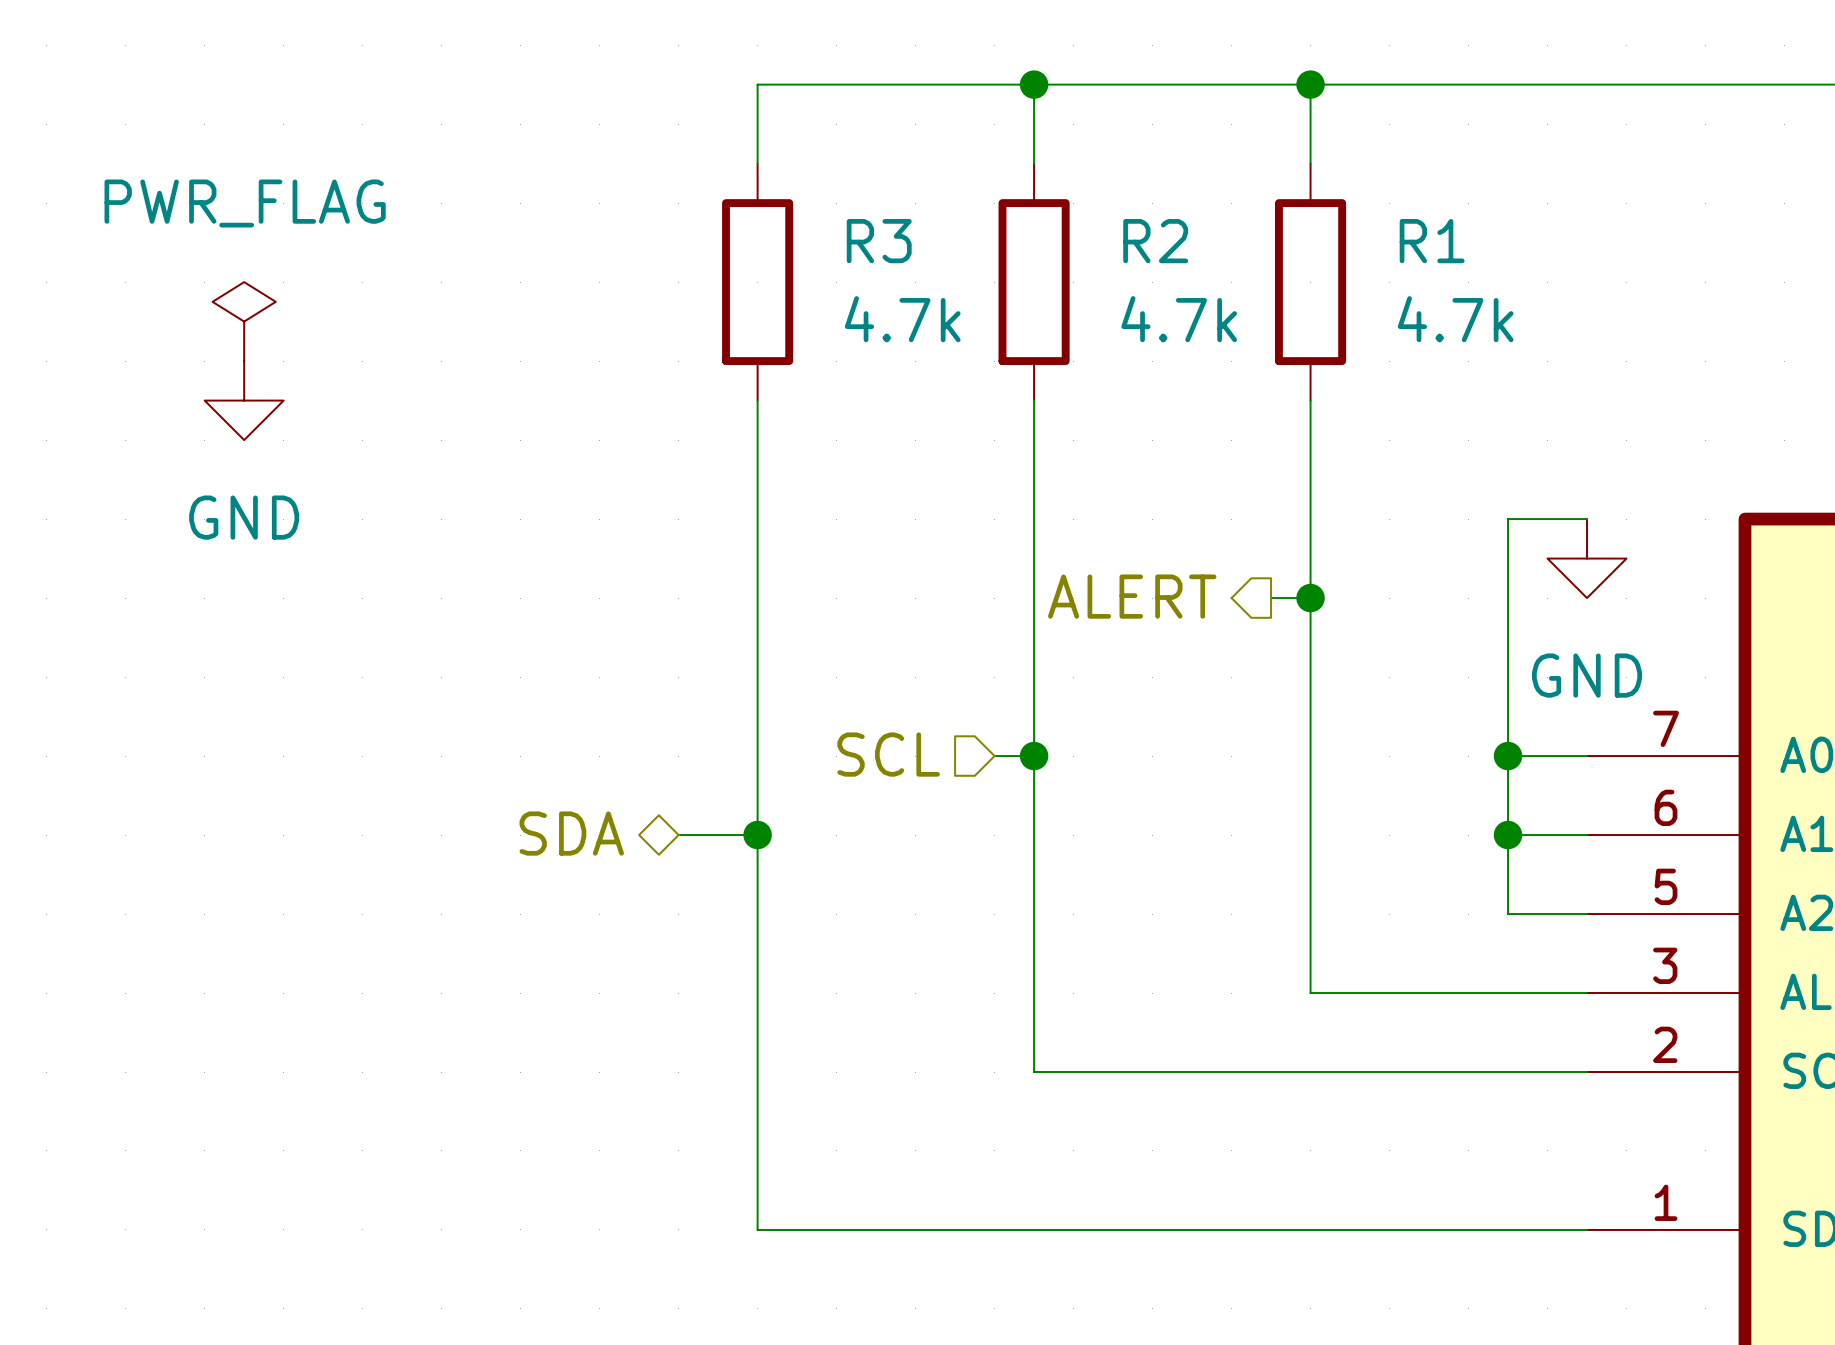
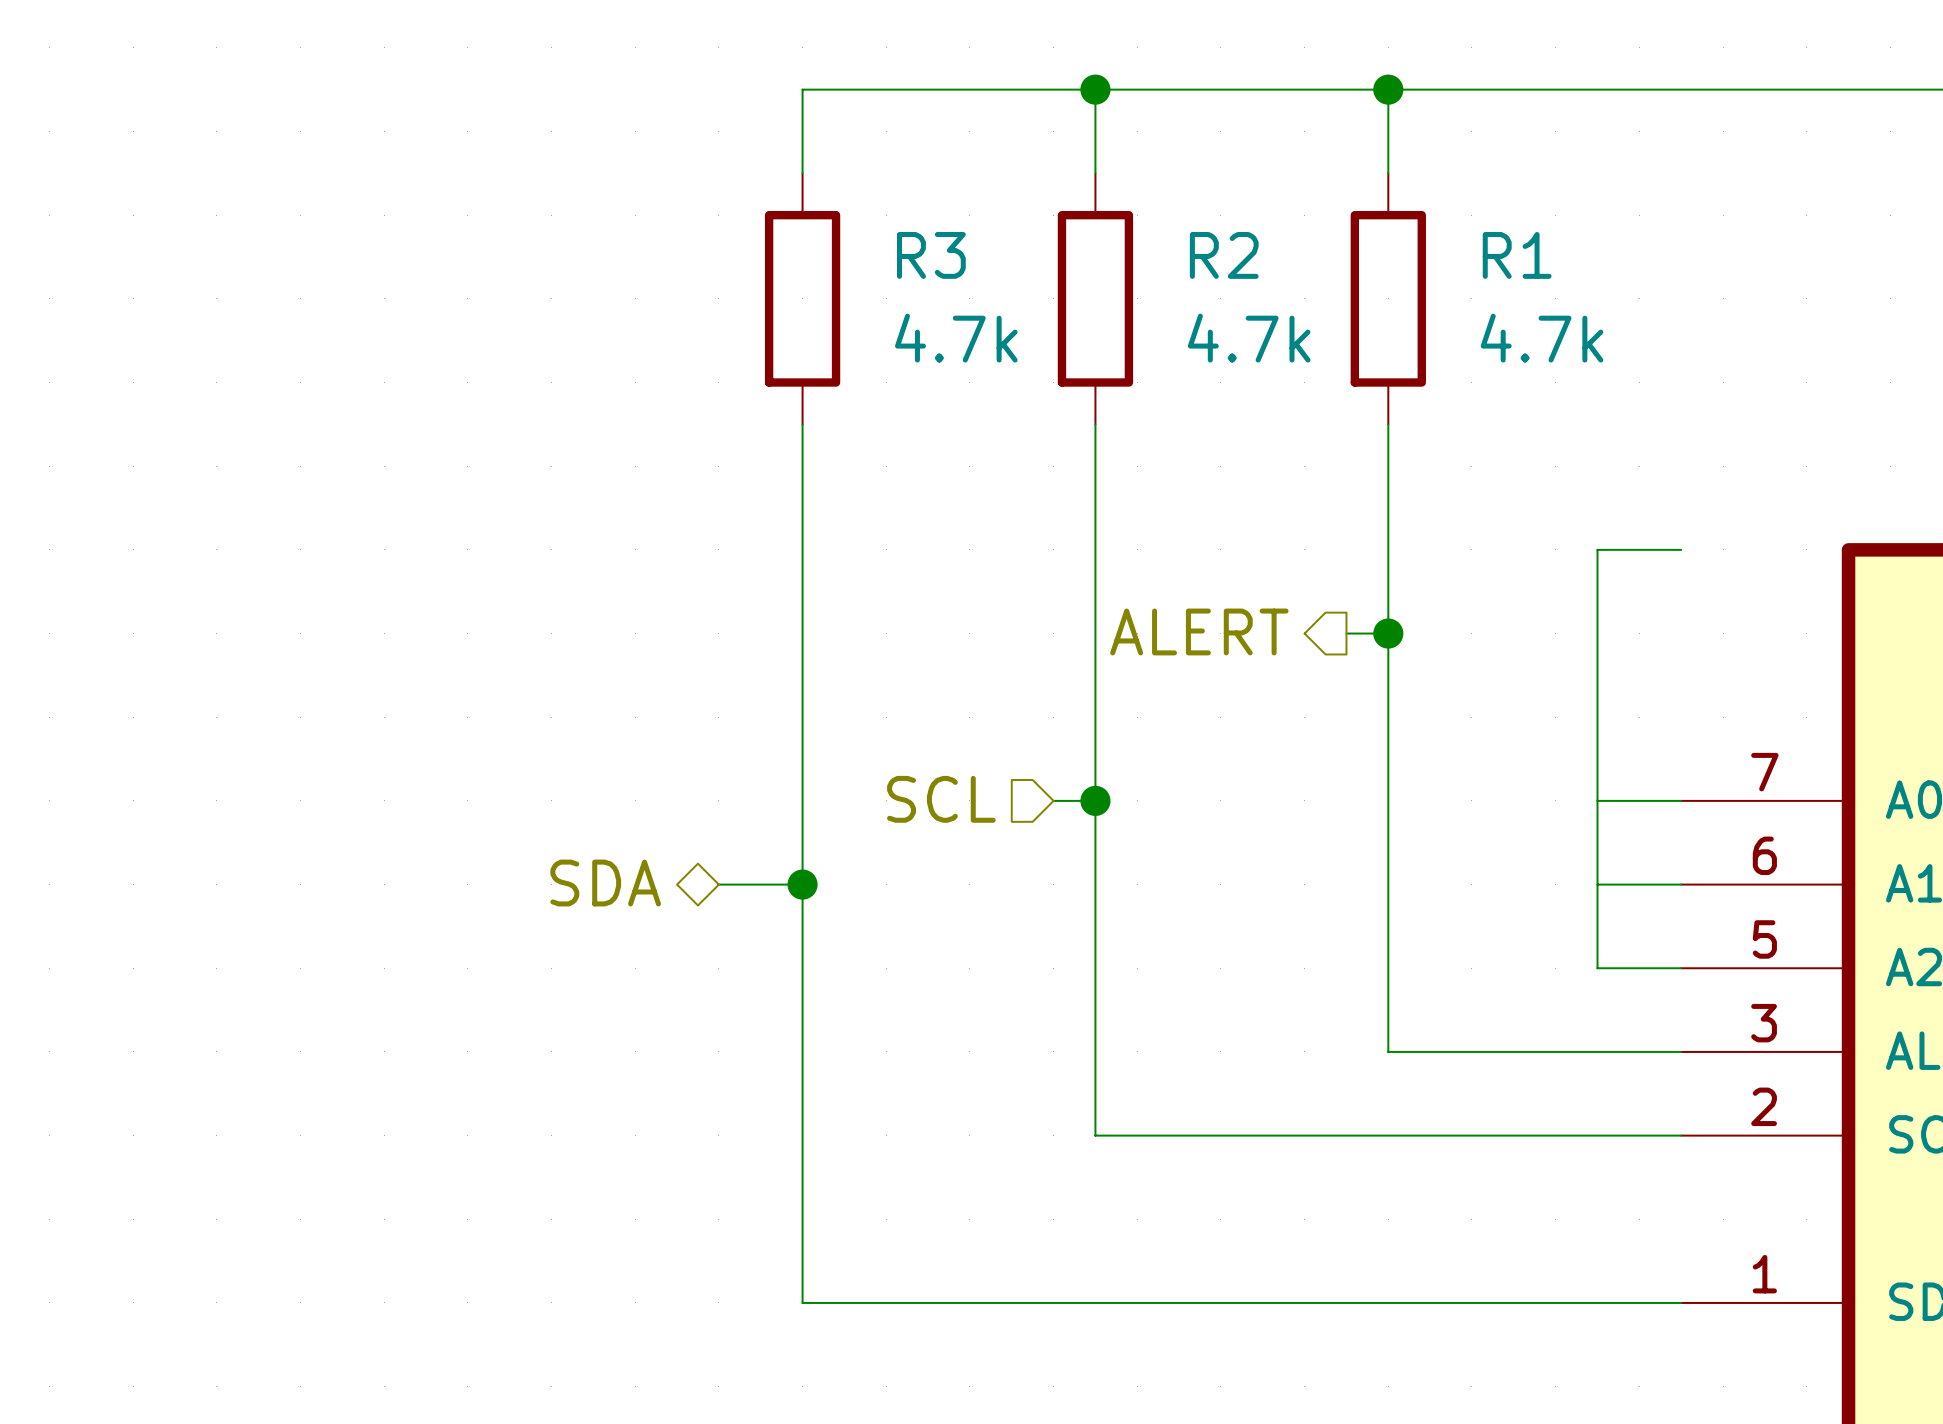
power symbol: PWR_FLAG (244, 321) -> none
power symbol: GND (244, 400) -> none
power symbol: GND (1587, 558) -> none
junction: (1508, 756) -> none
junction: (1508, 835) -> none

